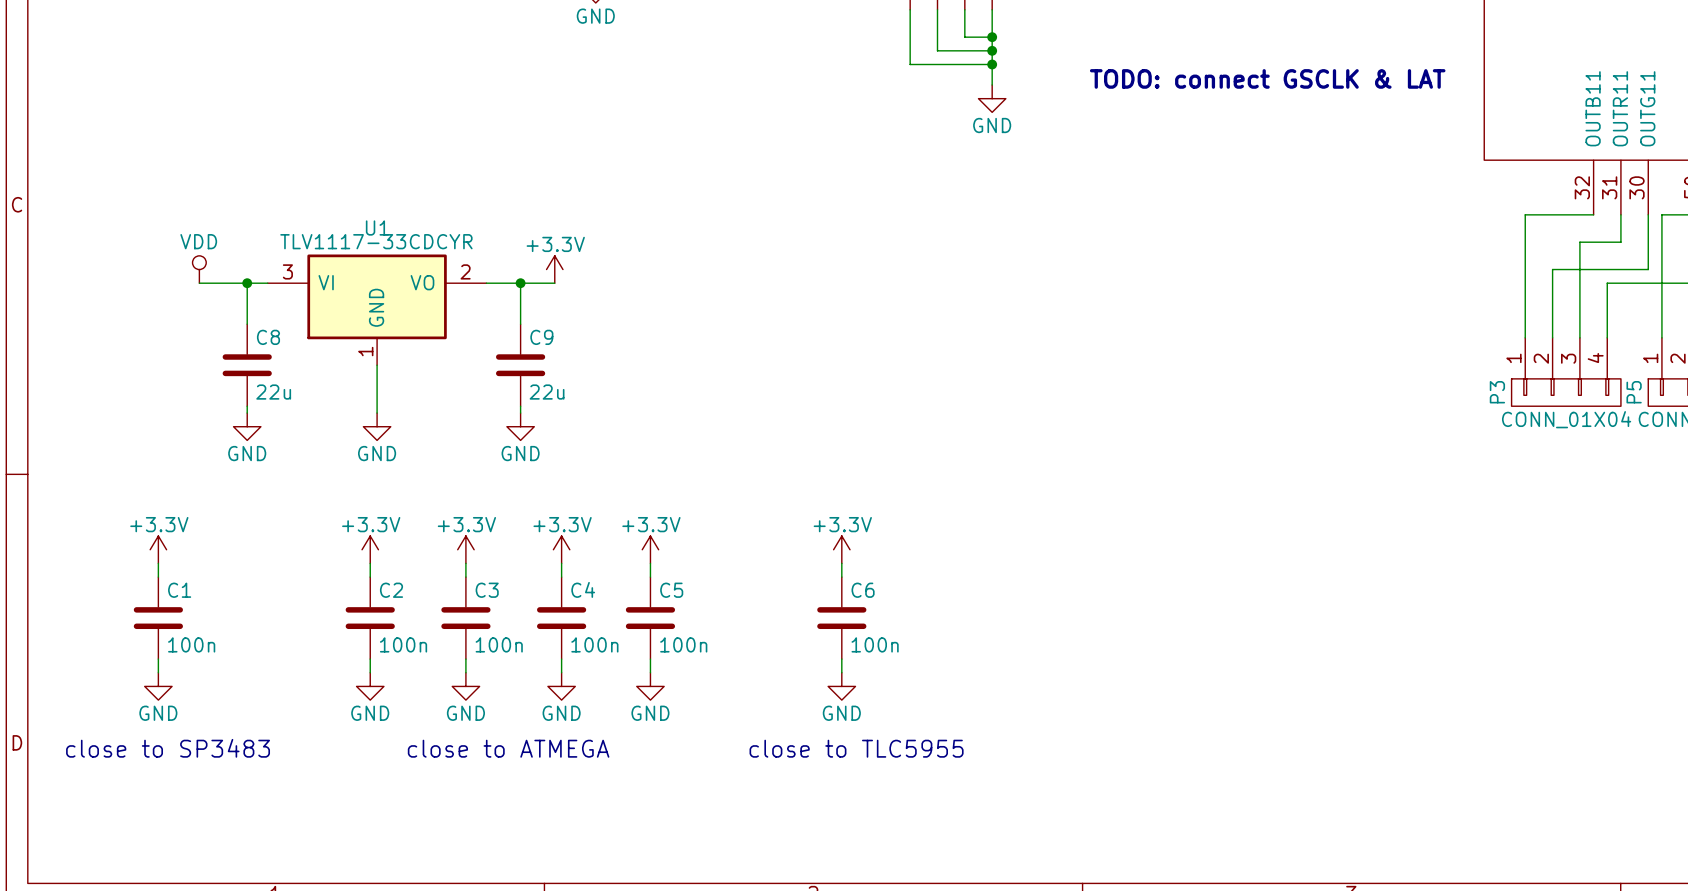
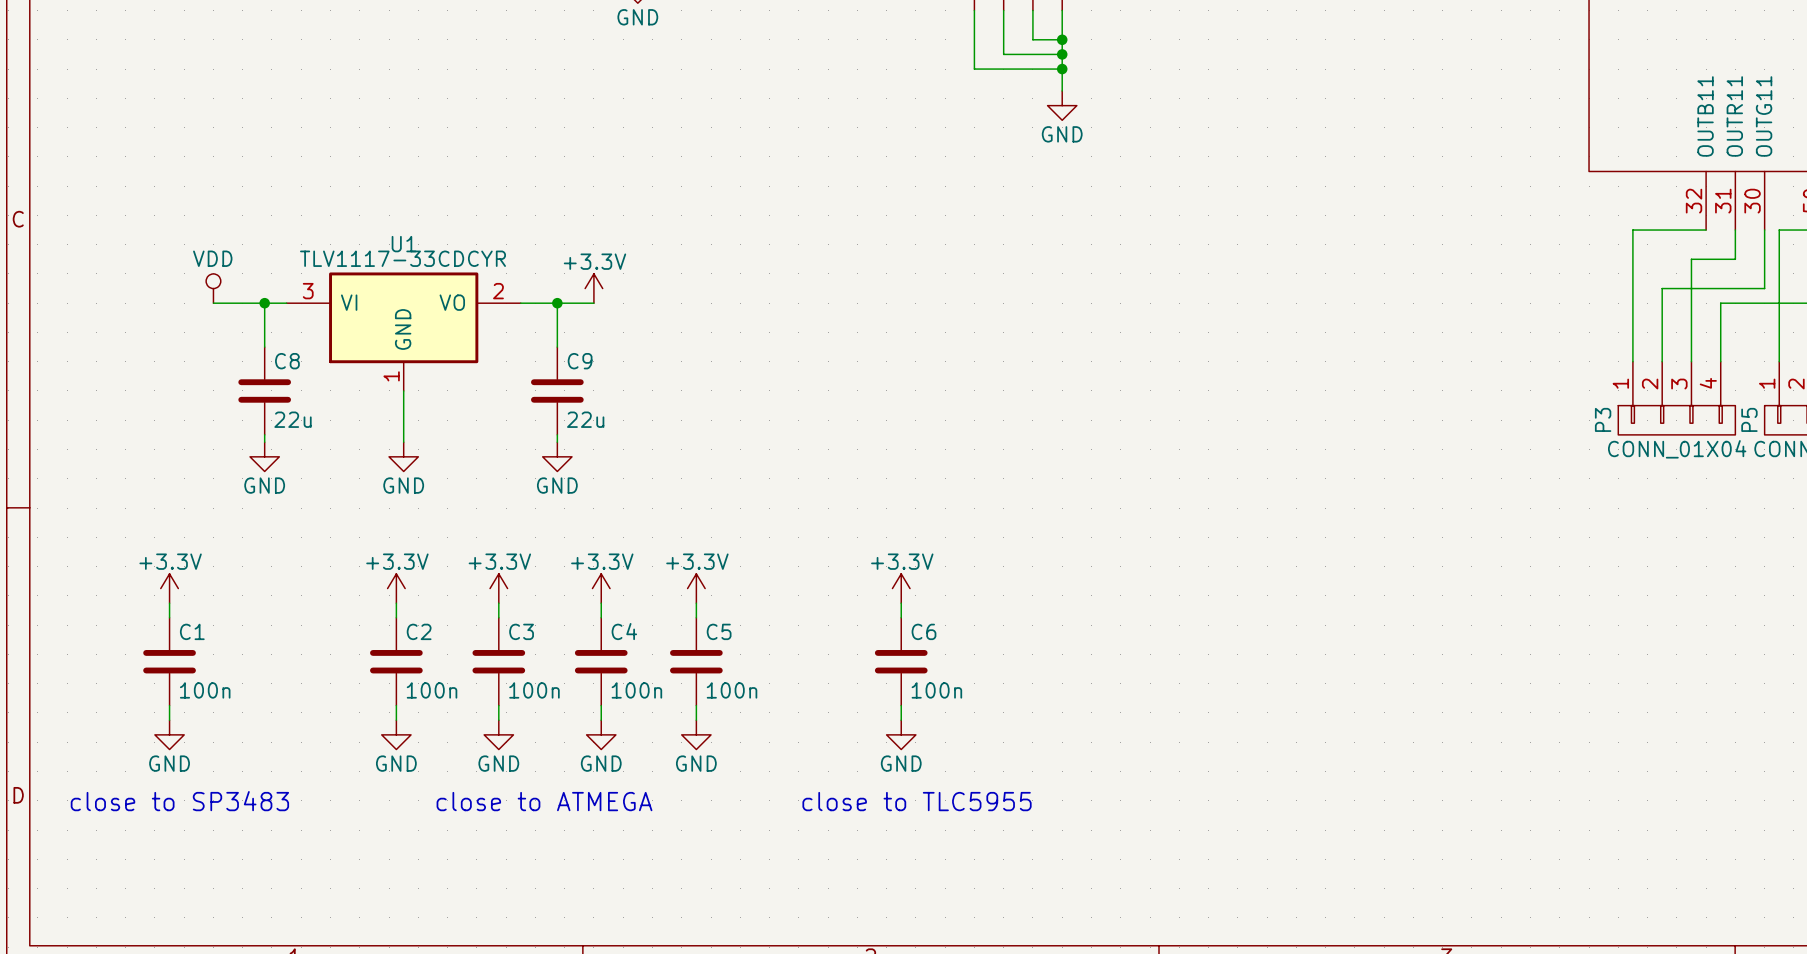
text: TODO: connect GSCLK & LAT (1267, 78) -> none

